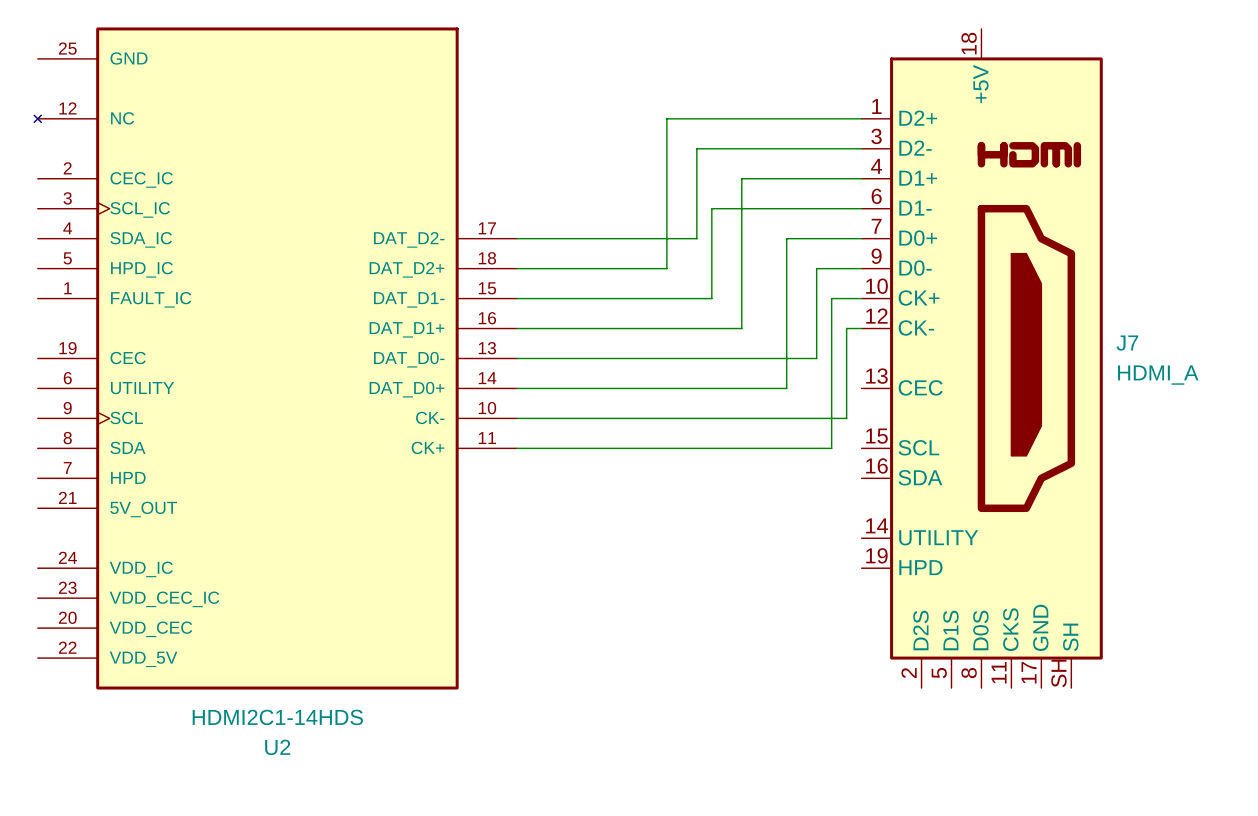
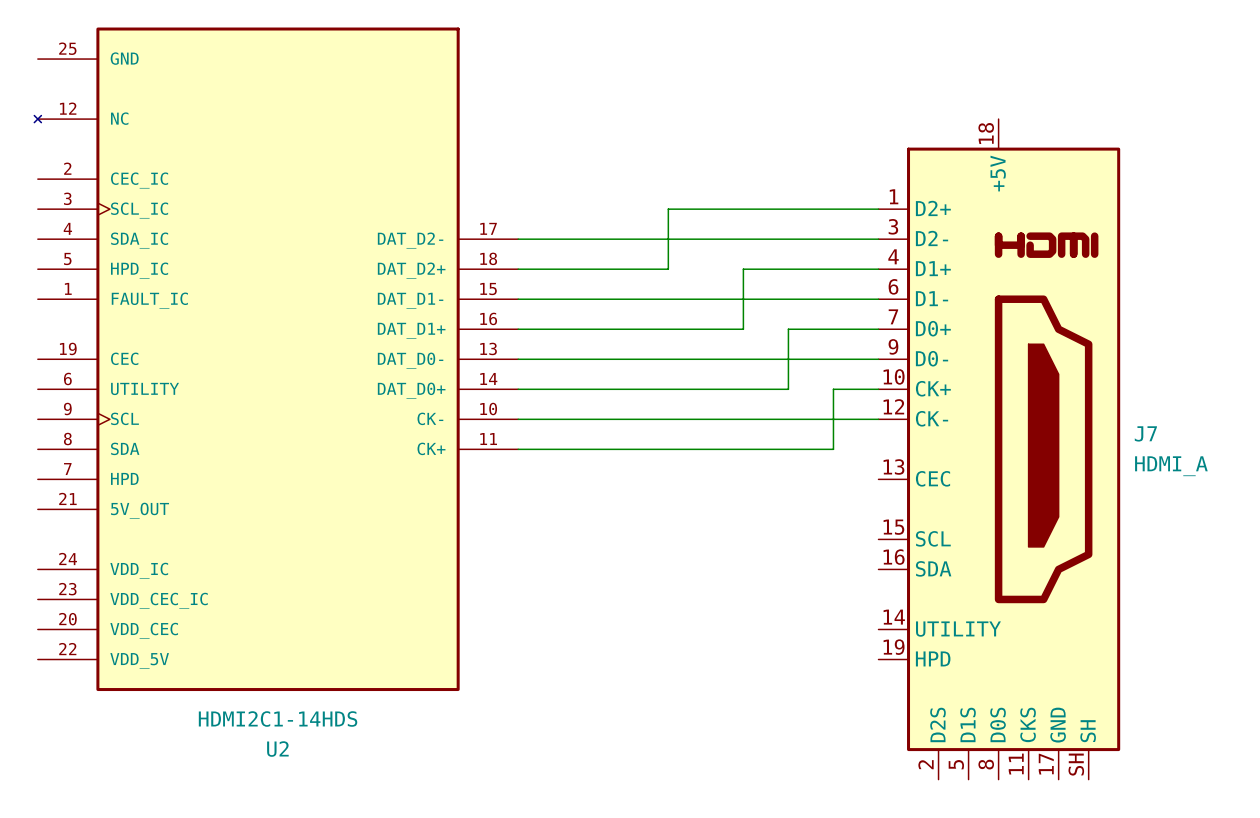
wire: (861, 118) (666, 118) (666, 208) -> none
wire: (861, 148) (696, 148) (696, 238) -> (788, 239) (698, 239)
wire: (861, 178) (741, 178) (741, 268) -> (818, 269) (743, 269)
wire: (711, 208) (711, 298) -> (713, 209) (668, 209)
wire: (786, 238) (786, 328) -> (848, 329) (788, 329)
wire: (816, 268) (816, 358) -> (878, 359) (818, 359)
wire: none -> (713, 299) (833, 299)
wire: (831, 298) (831, 388) -> (878, 389) (833, 389)
wire: (846, 328) (846, 418) -> (878, 419) (848, 419)
J7 position: (982, 358) -> (999, 449)

